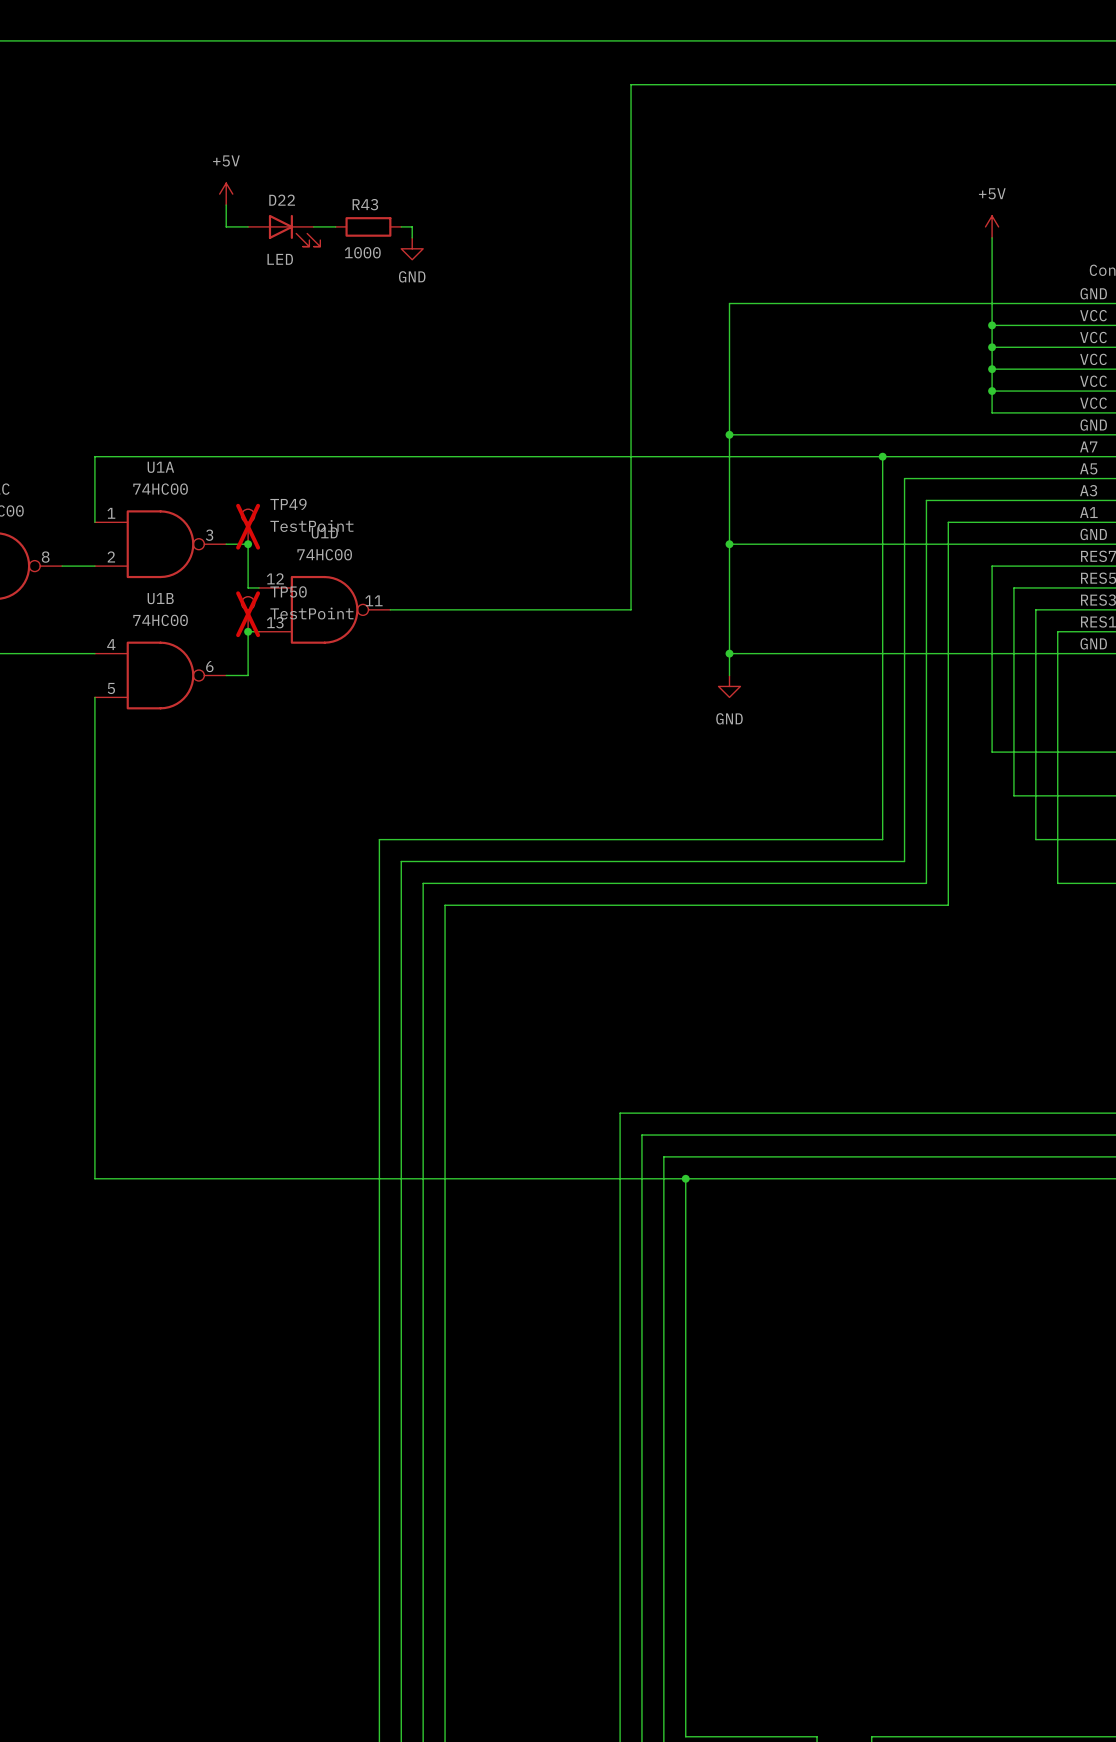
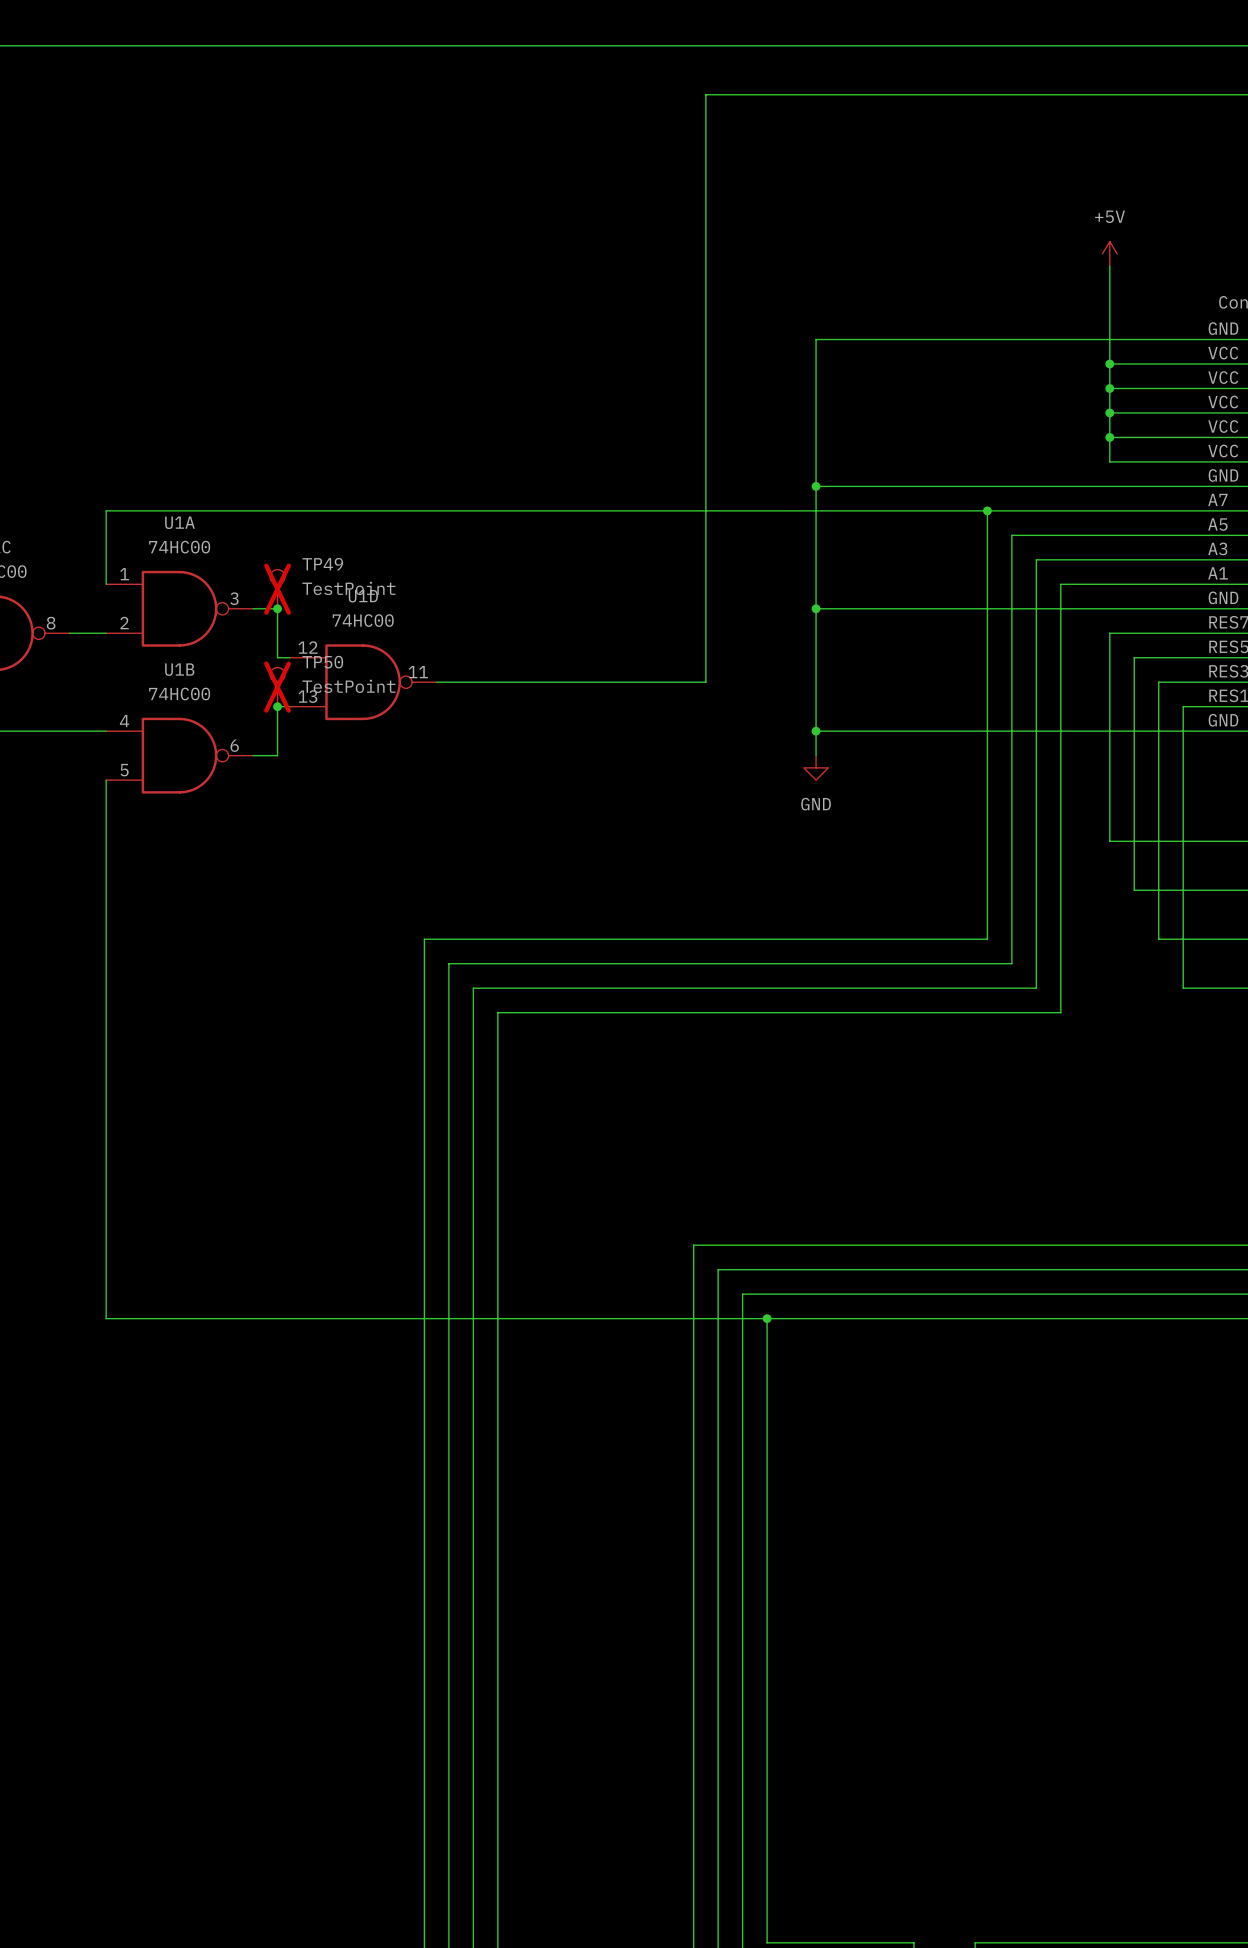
power symbol: +5V (226, 194) -> none
wire: (226, 205) (226, 226) (248, 226) -> none
wire: (313, 226) (335, 226) -> none
R43: 1000 (368, 226) -> none
wire: (401, 226) (412, 226) (412, 237) -> none
D22: LED (284, 230) -> none
power symbol: GND (412, 248) -> none

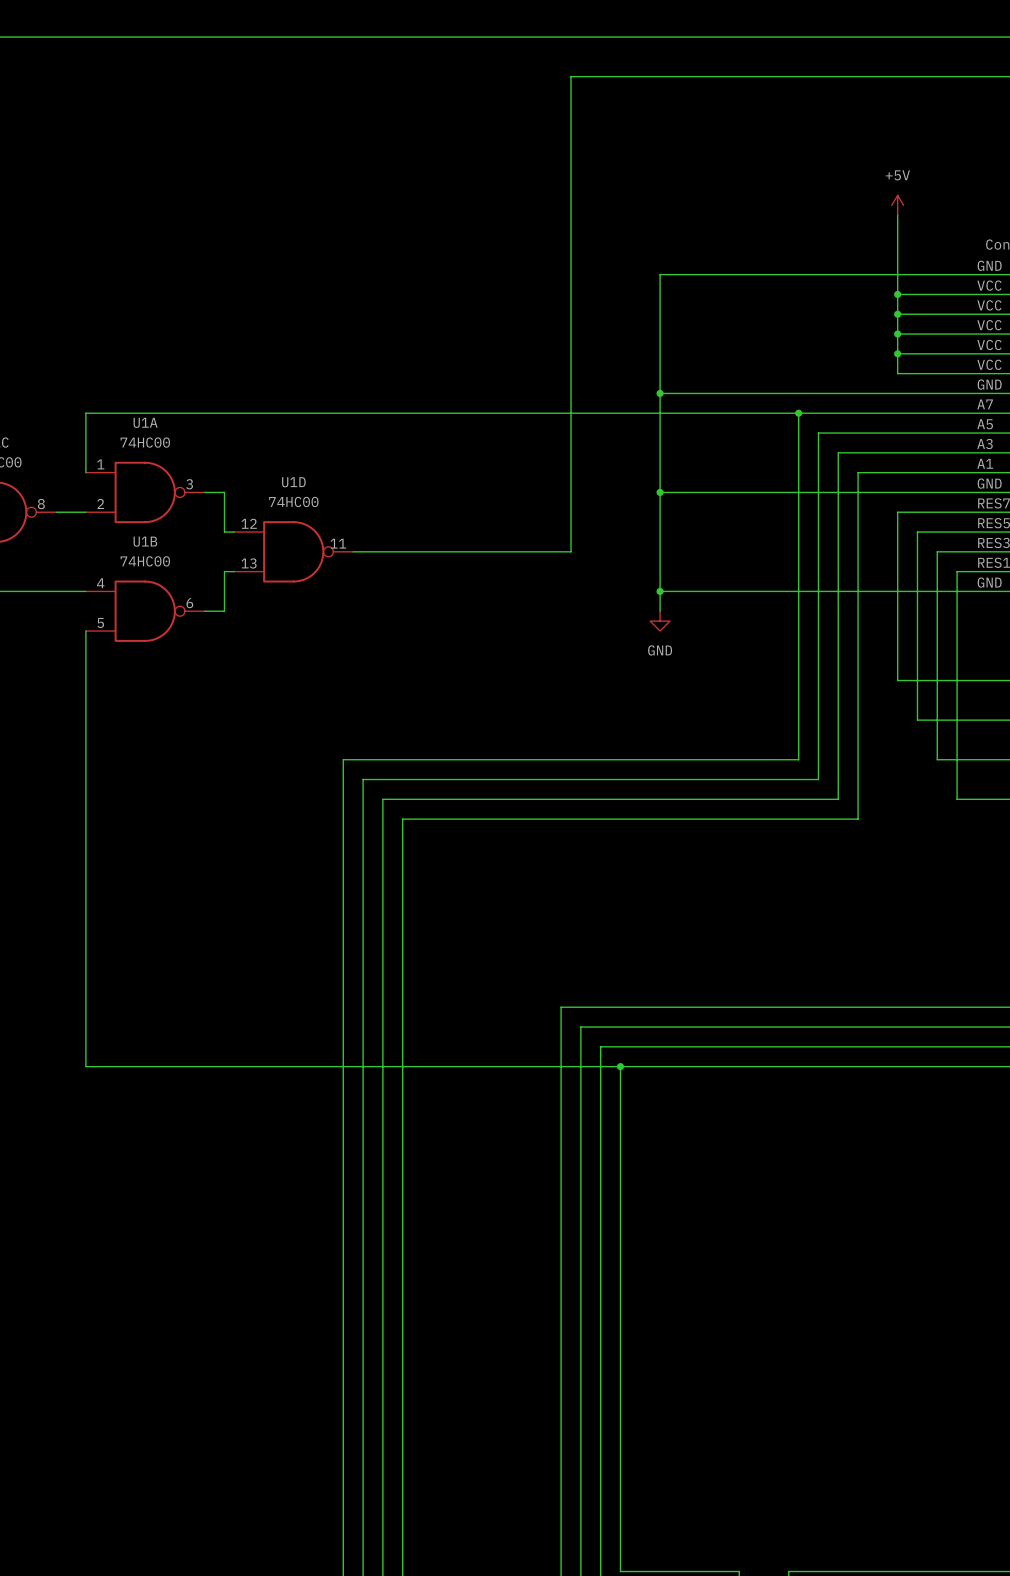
TP49: TestPoint (277, 589) -> none
junction: (277, 608) -> none
TP50: TestPoint (277, 687) -> none
junction: (277, 706) -> none

